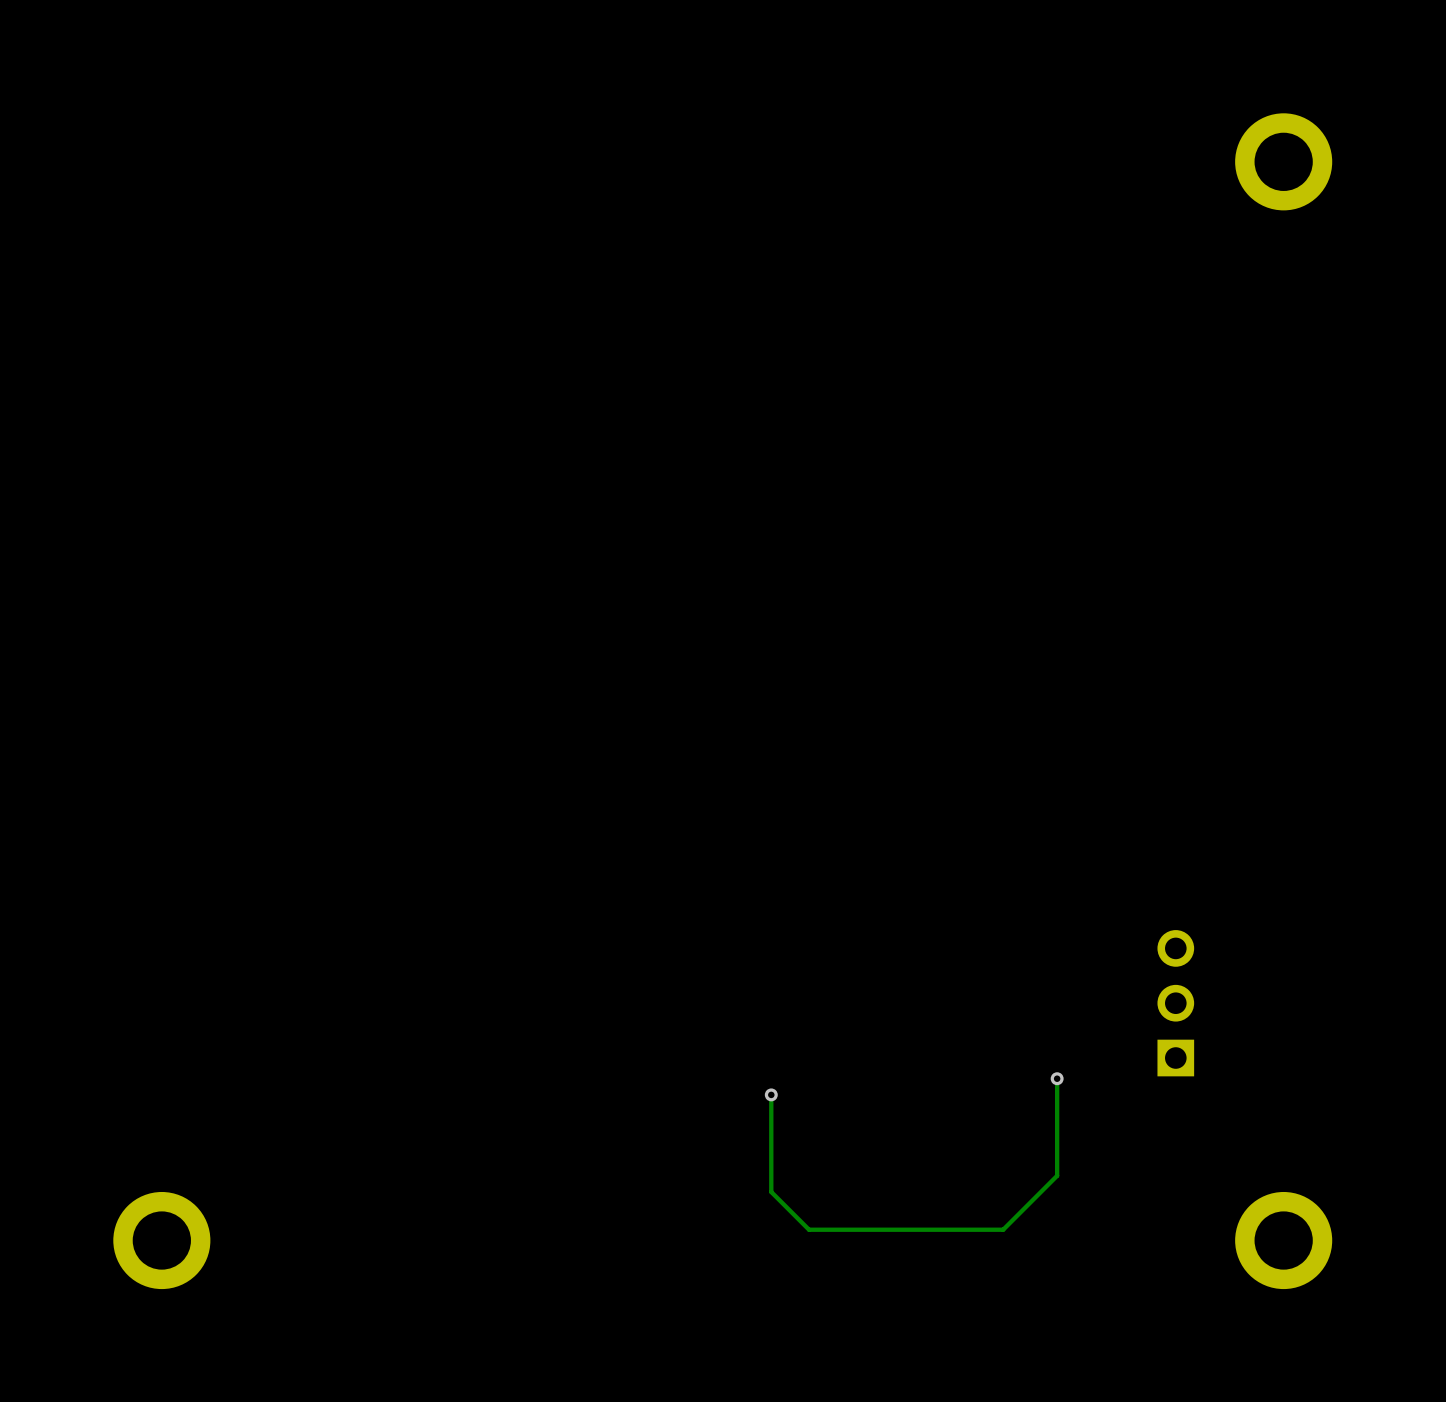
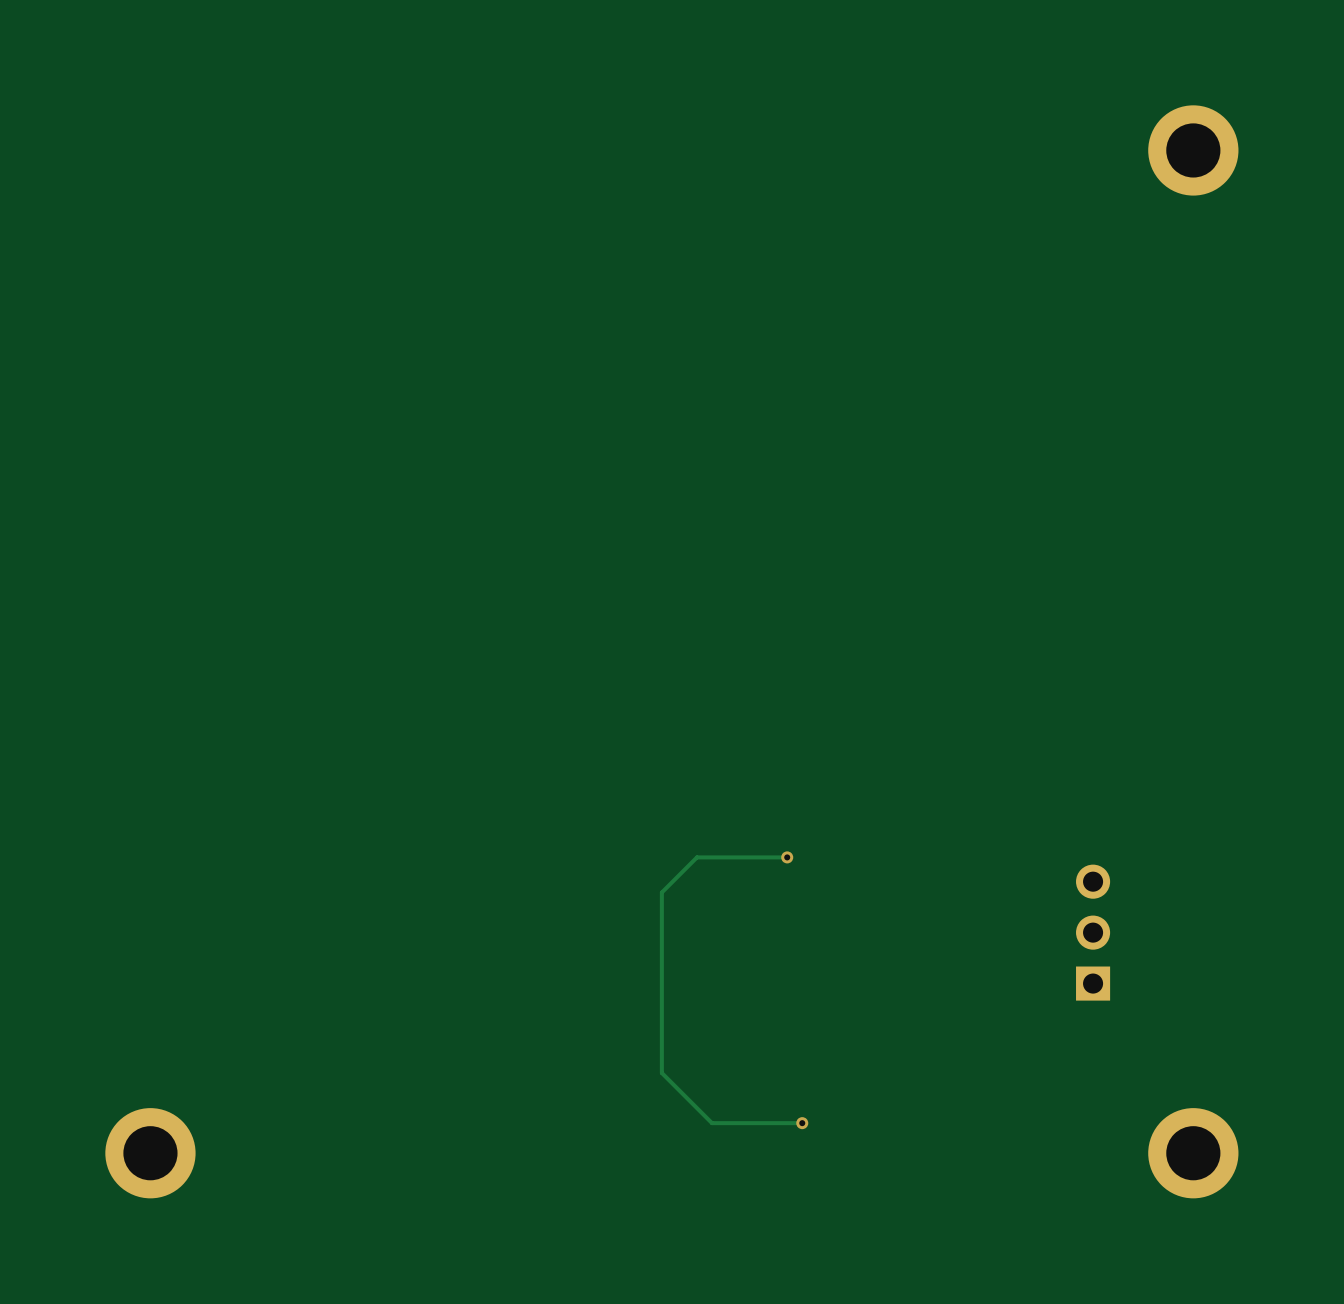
track: none -> (787, 857) (696, 857) (661, 892) (661, 1073) (712, 1123) (802, 1123)
via: none -> (787, 857)
track: (1057, 1078) (1057, 1175) (1003, 1229) (809, 1229) (771, 1191) (771, 1094) -> none
via: (1057, 1078) -> none
via: (771, 1094) -> none
via: none -> (802, 1123)

